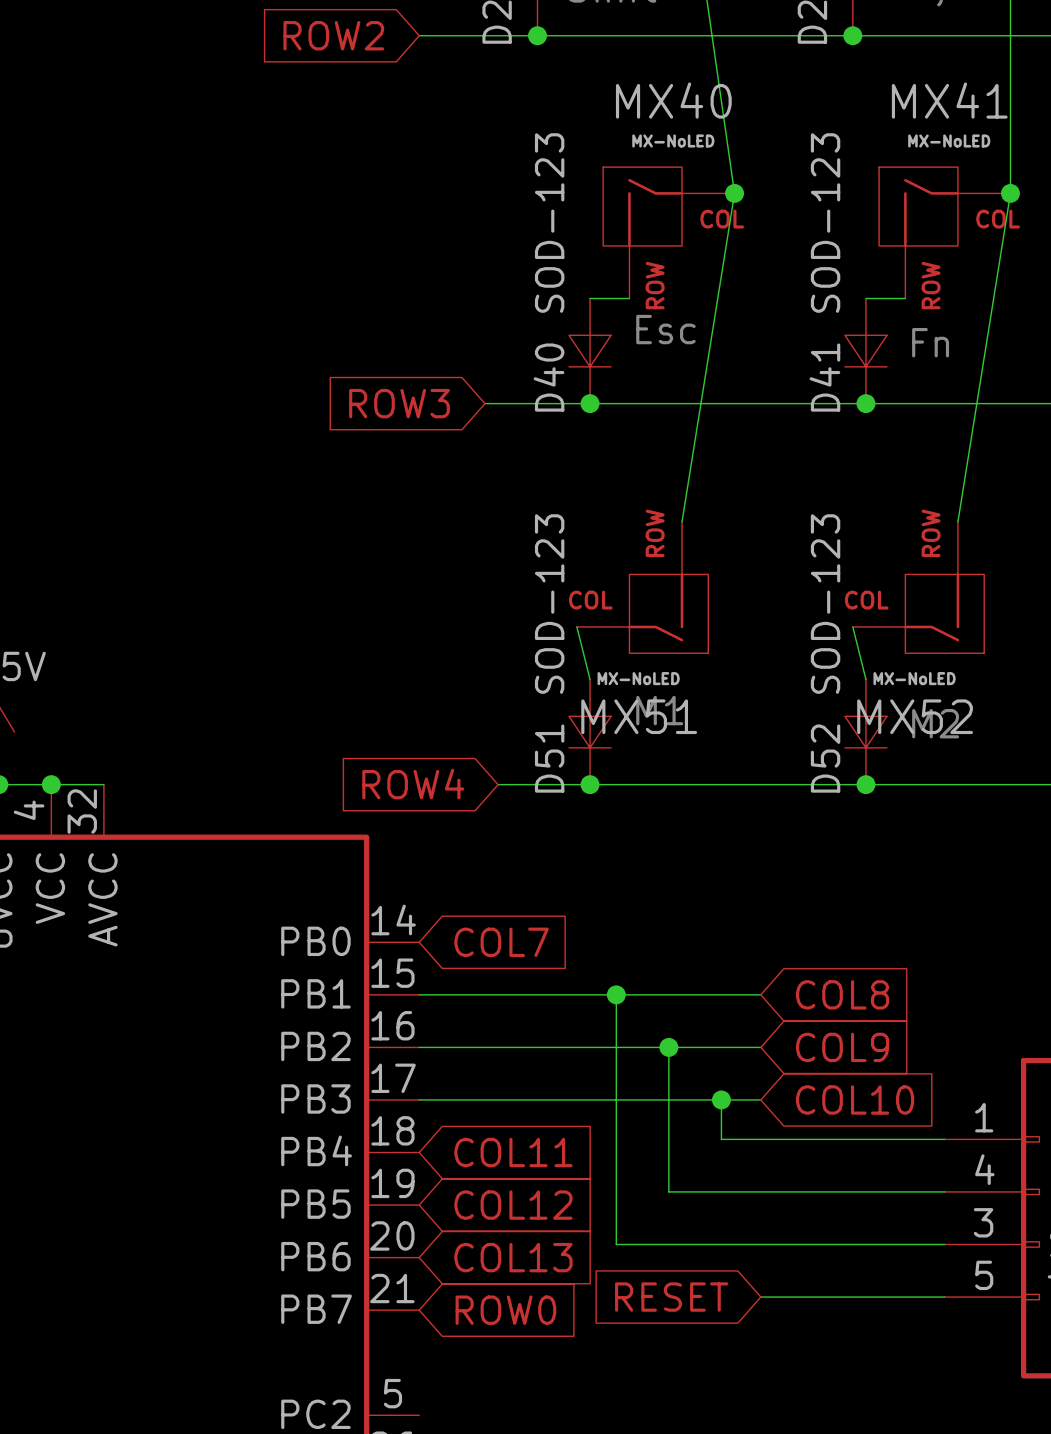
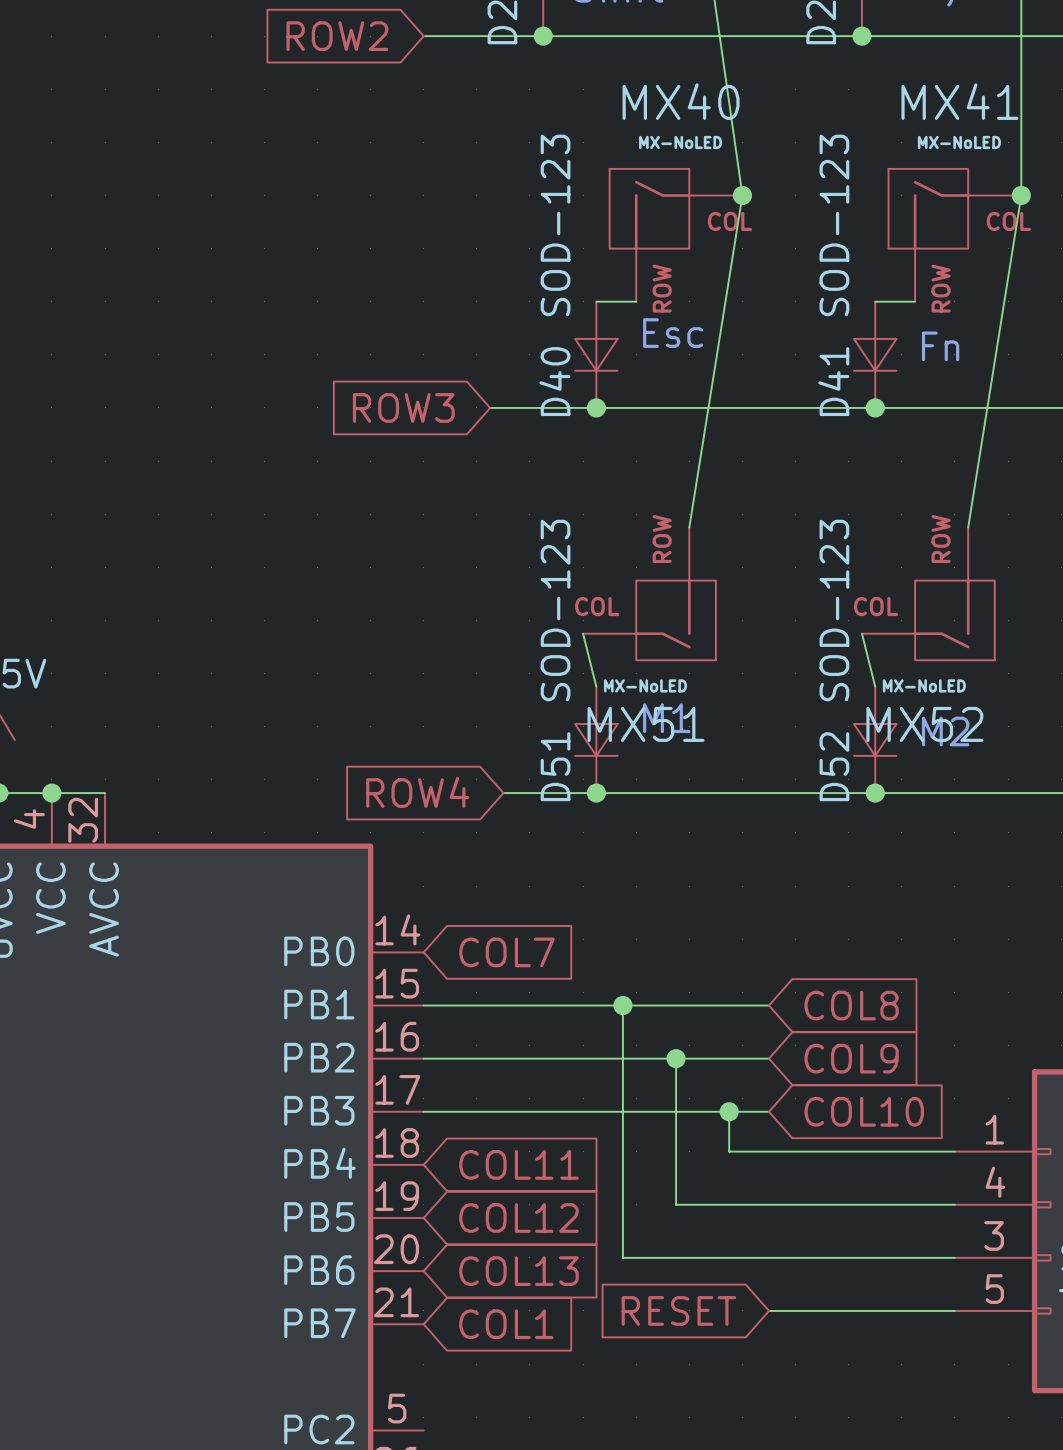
global label: ROW0 (505, 1310) -> COL1 (506, 1324)

